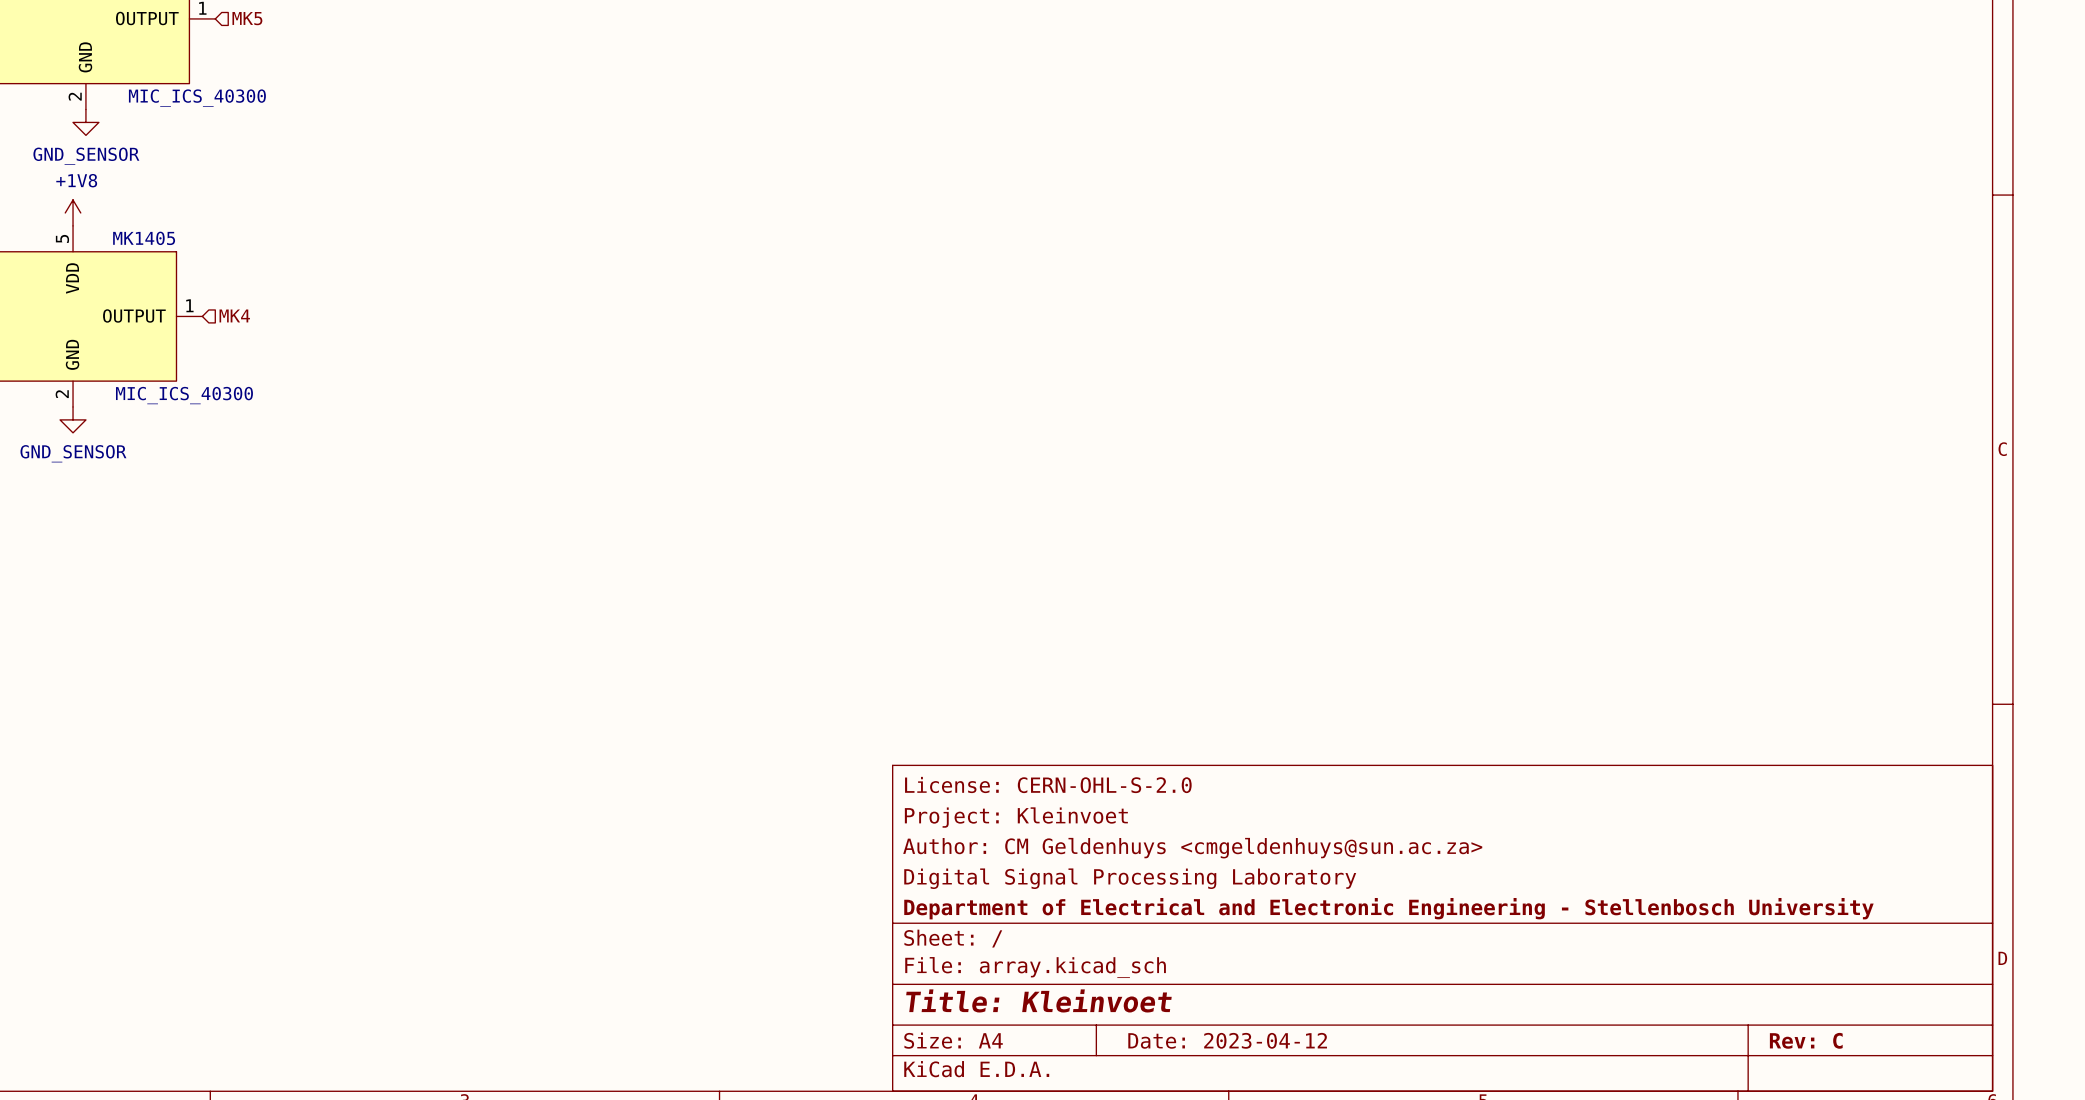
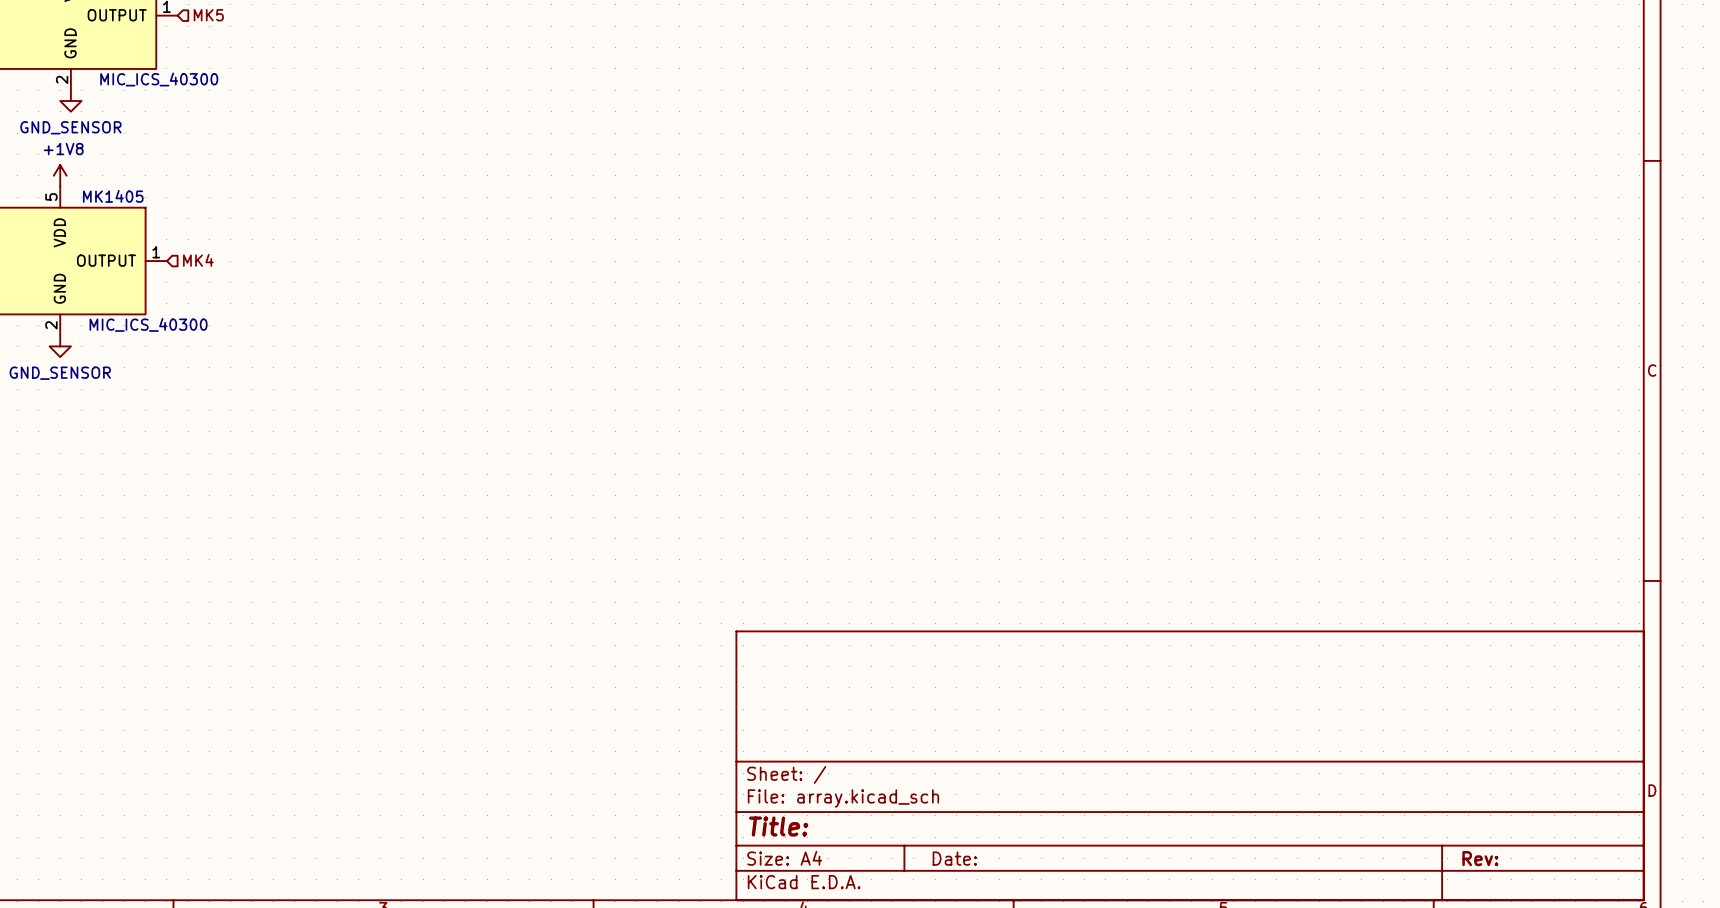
title block: License: CERN-OHL-S-2.0 (1048, 785) -> none
title block: Project: Kleinvoet (1016, 817) -> none
title block: Author: CM Geldenhuys <cmgeldenhuys@sun.ac.za> (1192, 848) -> none
title block: Digital Signal Processing Laboratory (1130, 878) -> none
title block: Department of Electrical and Electronic Engineering - Stellenbosch University (1388, 908) -> none
title block: Title: Kleinvoet (1038, 1000) -> Title: (778, 826)
title block: Date: 2023-04-12 (1227, 1040) -> Date: (954, 858)
title block: Rev: C (1806, 1040) -> Rev: (1480, 858)

